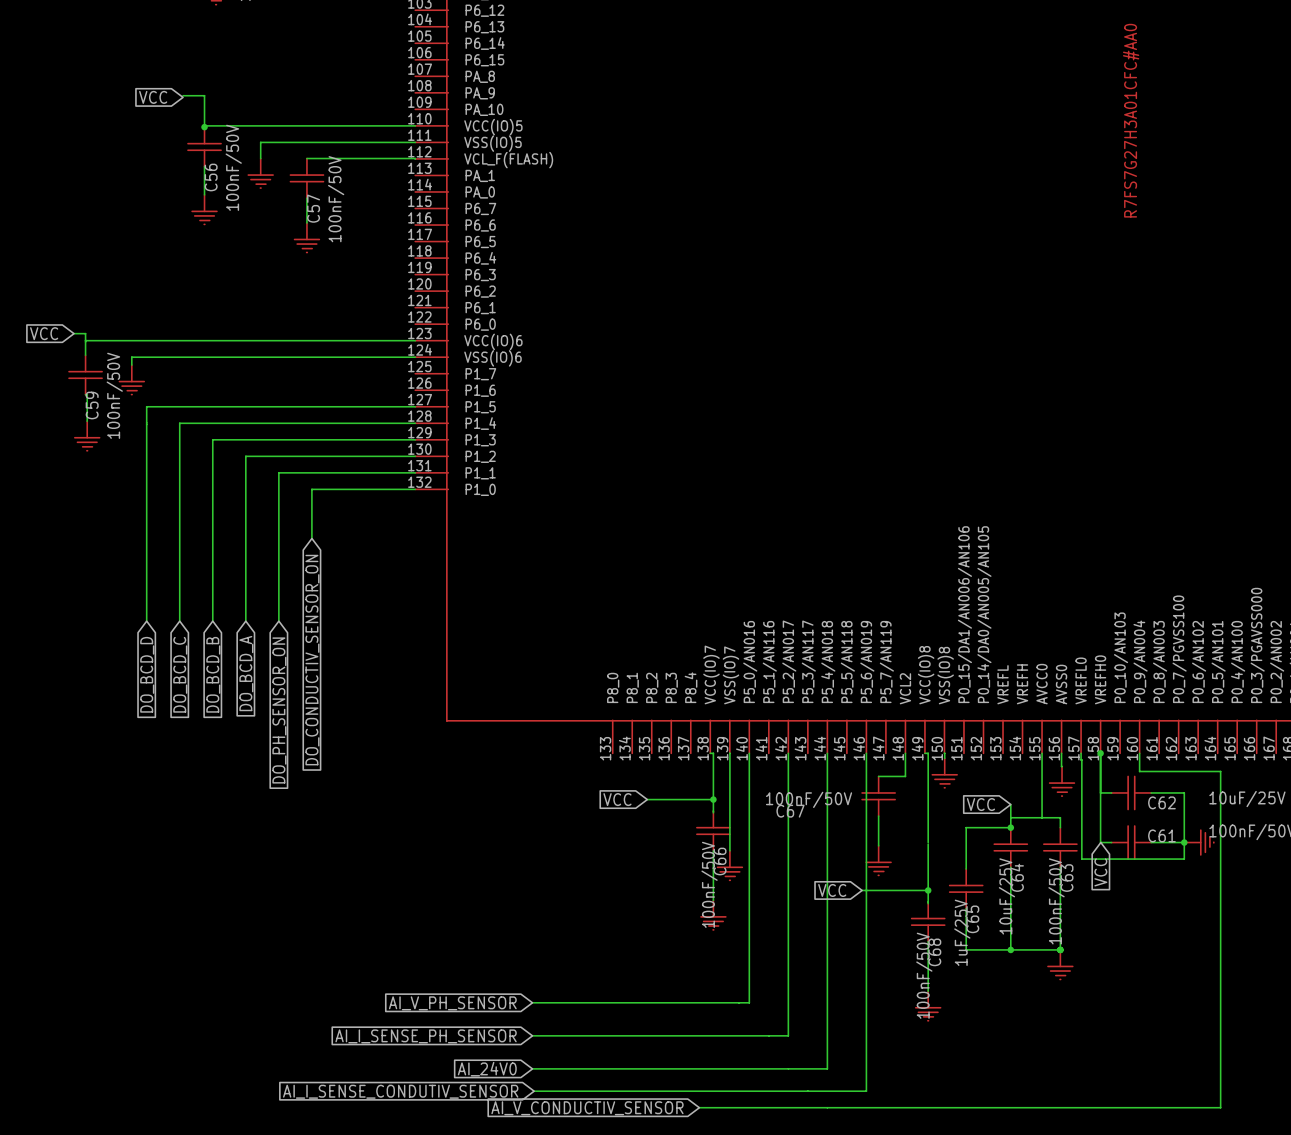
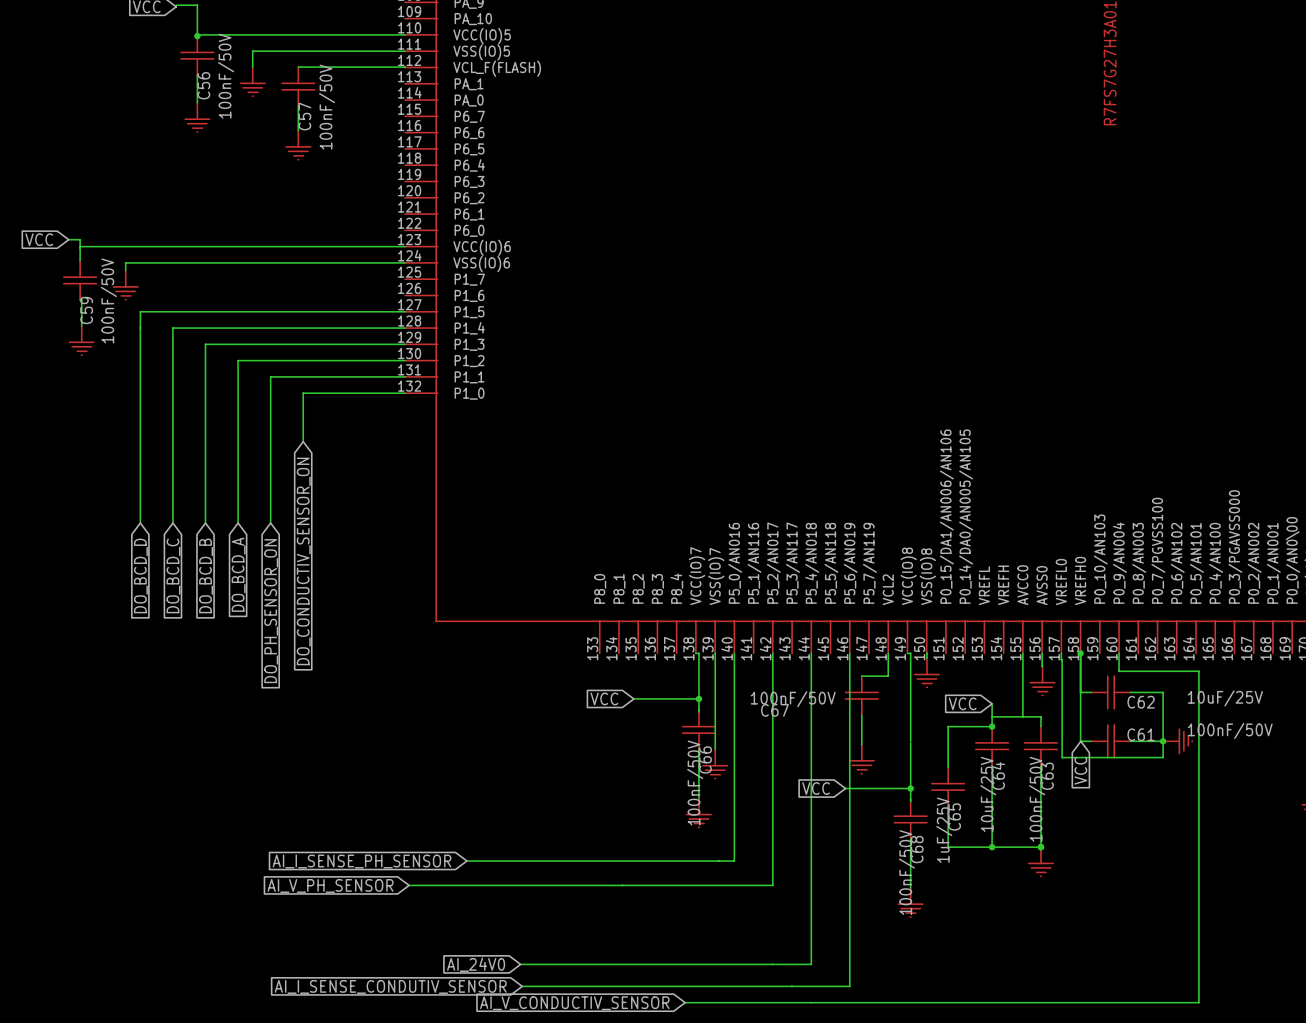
wire: (749, 963) (749, 1002) (532, 1002) -> (734, 860) (466, 860)
wire: (788, 988) (788, 1035) (532, 1035) -> (772, 885) (409, 885)
global label position: AI_V_PH_SENSOR (452, 1003) -> AI_V_PH_SENSOR (330, 885)
global label position: AI_I_SENSE_PH_SENSOR (426, 1036) -> AI_I_SENSE_PH_SENSOR (361, 861)

